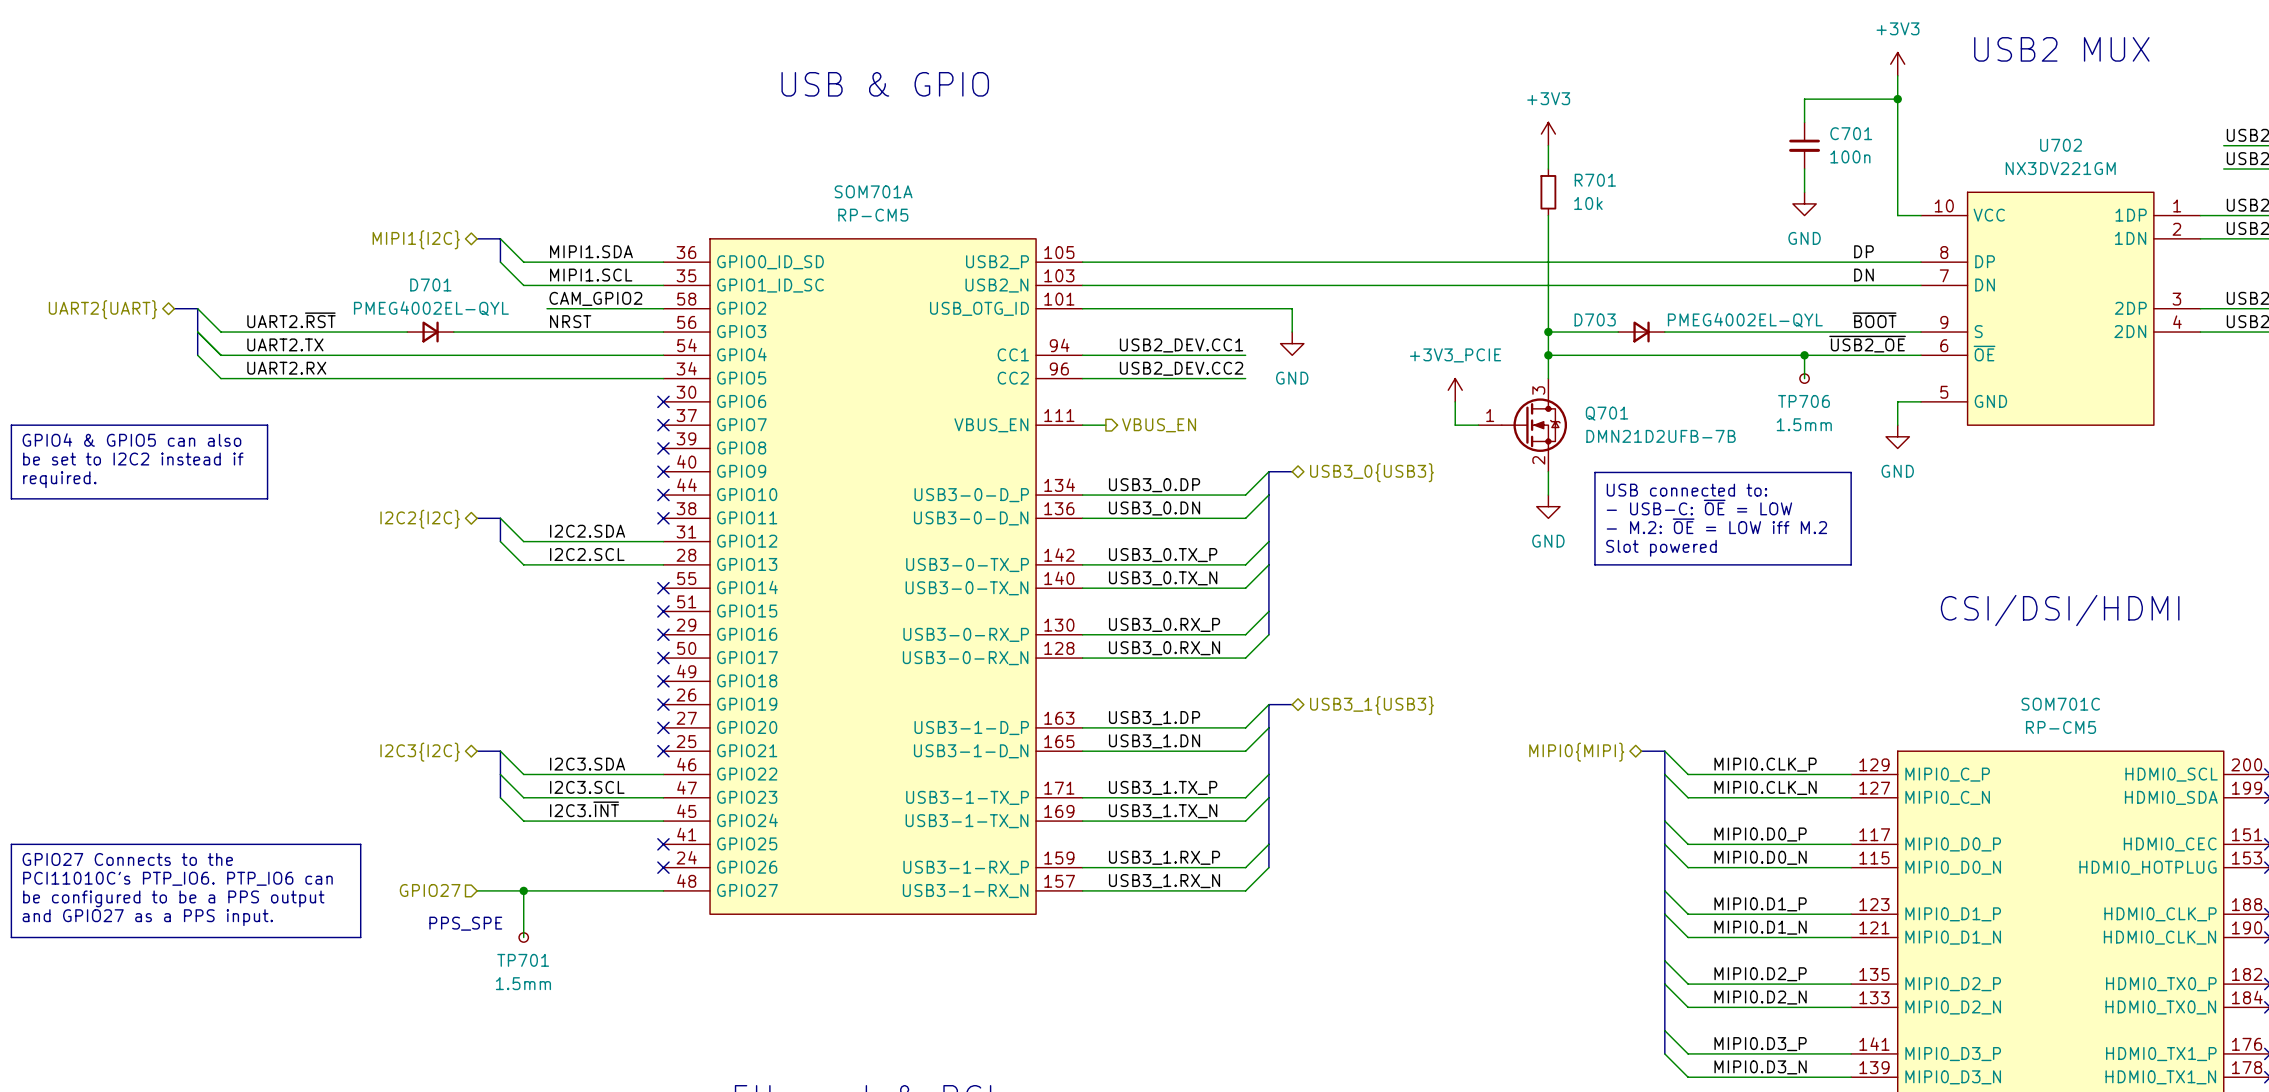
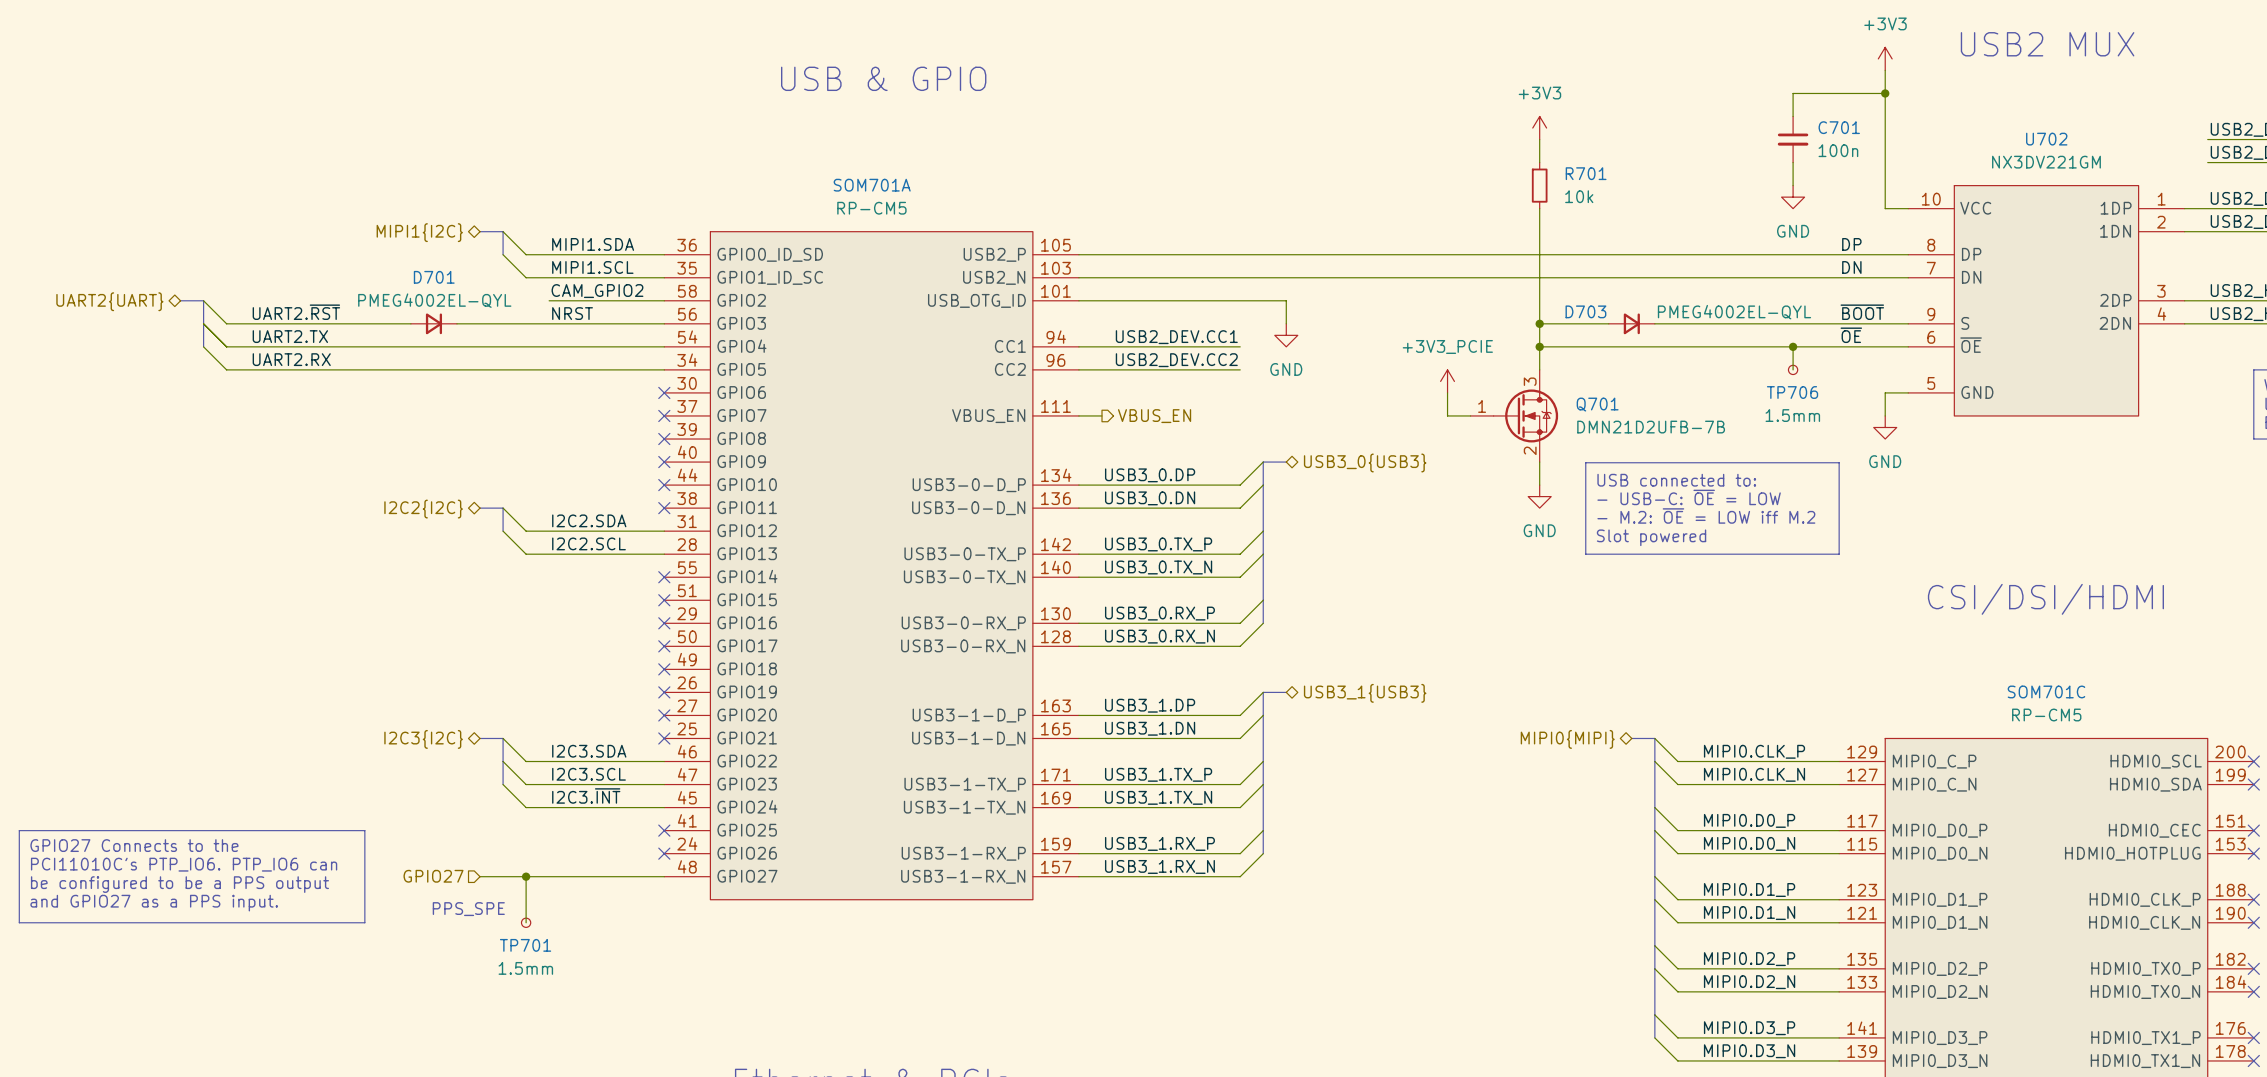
label: ~{USB2_OE} (1867, 344) -> ~{OE} (1851, 335)
line: (11, 425) (267, 425) (267, 498) (11, 498) (11, 425) -> none
text: GPIO4 & GPIO5 can also (131, 440) -> none
text: be set to I2C2 instead if (133, 459) -> none
text: required. (59, 479) -> none

